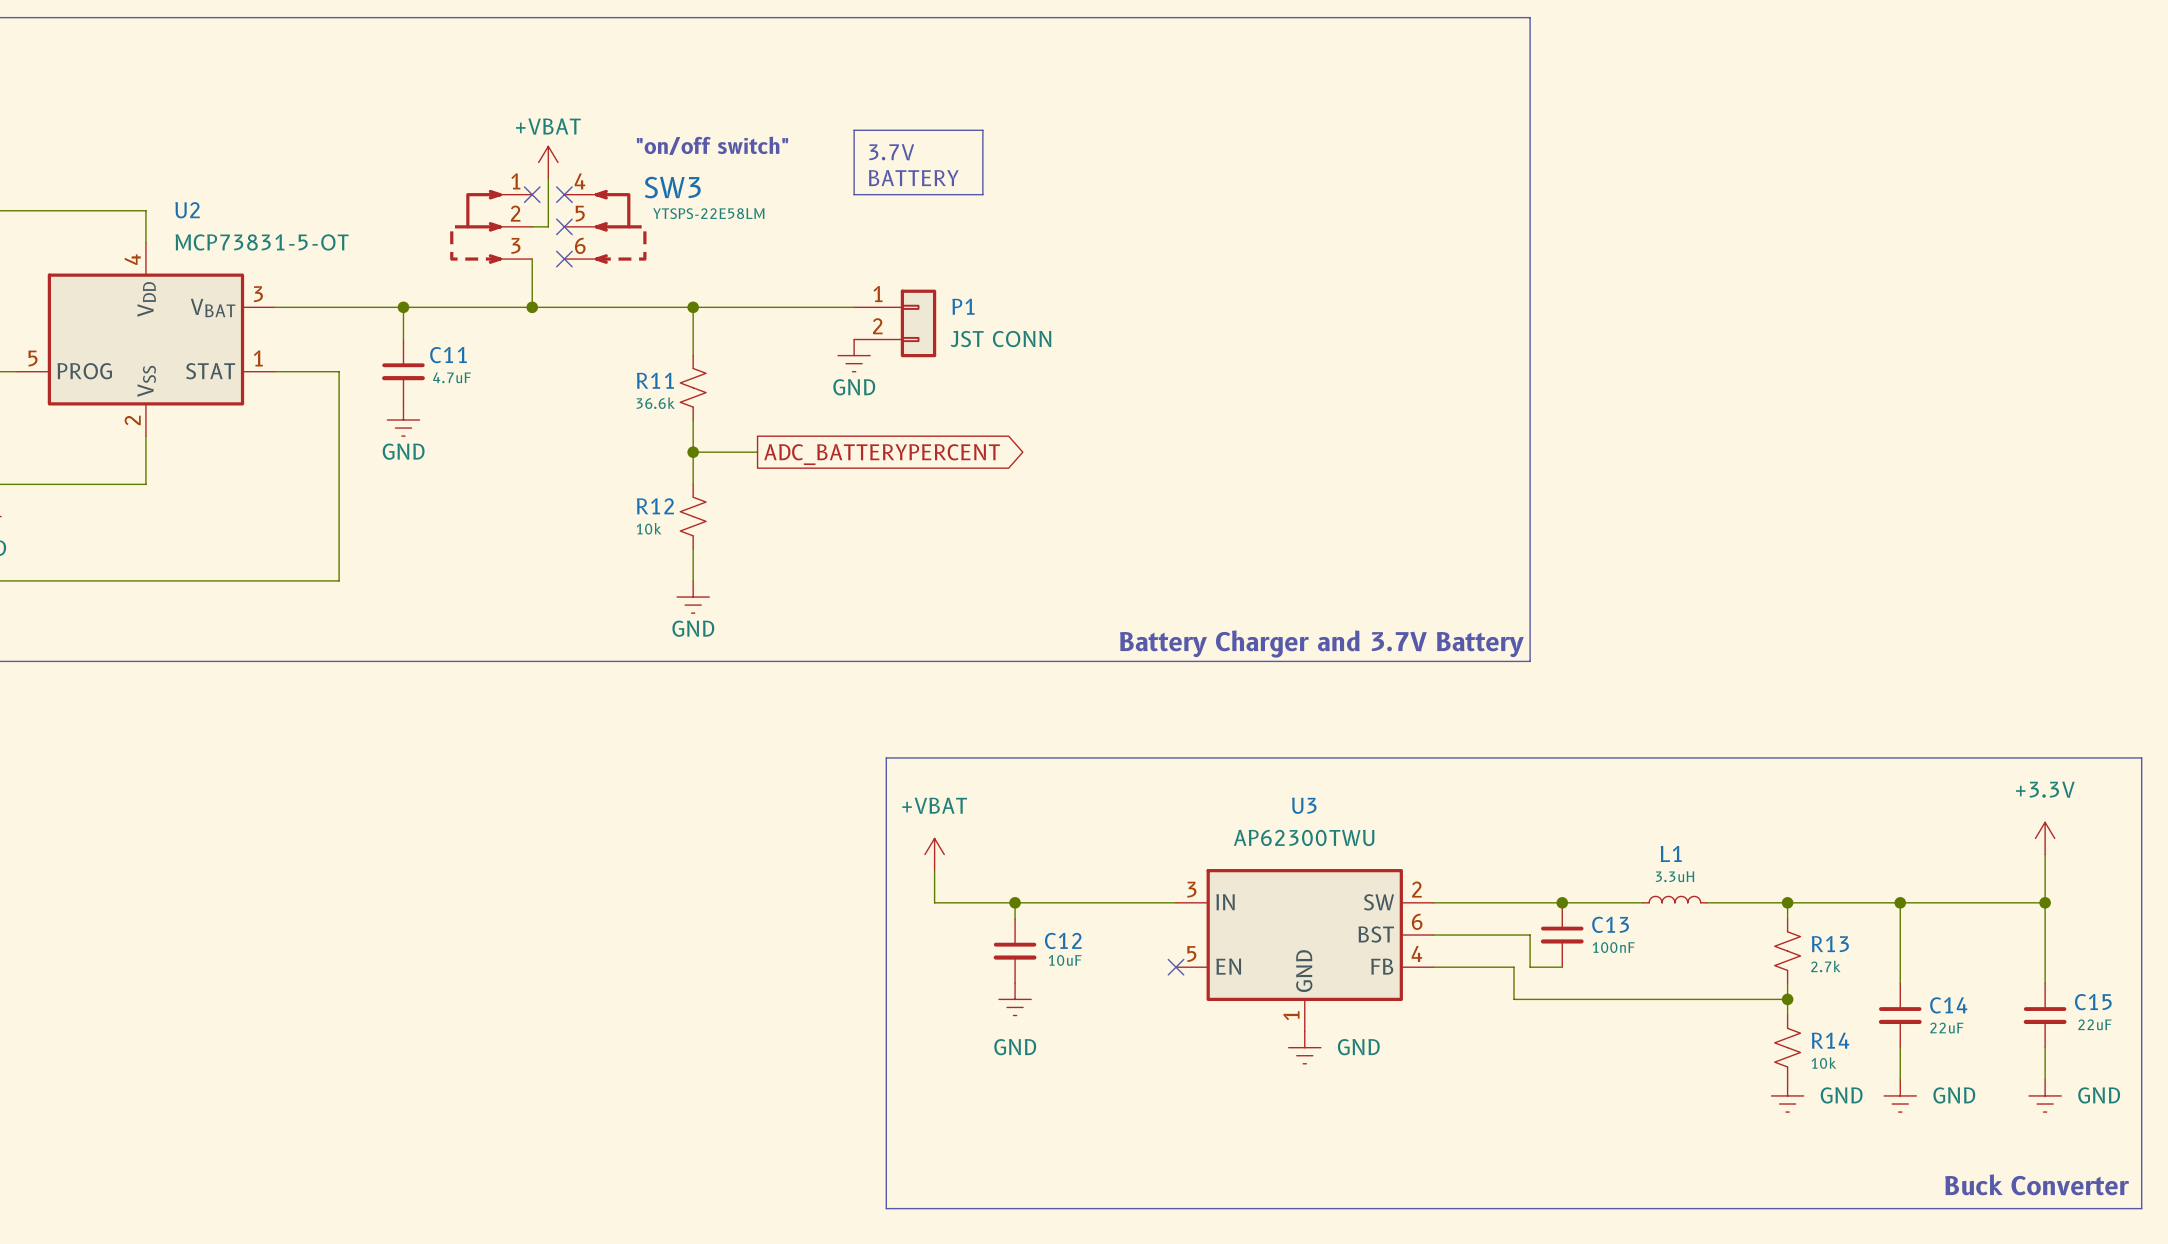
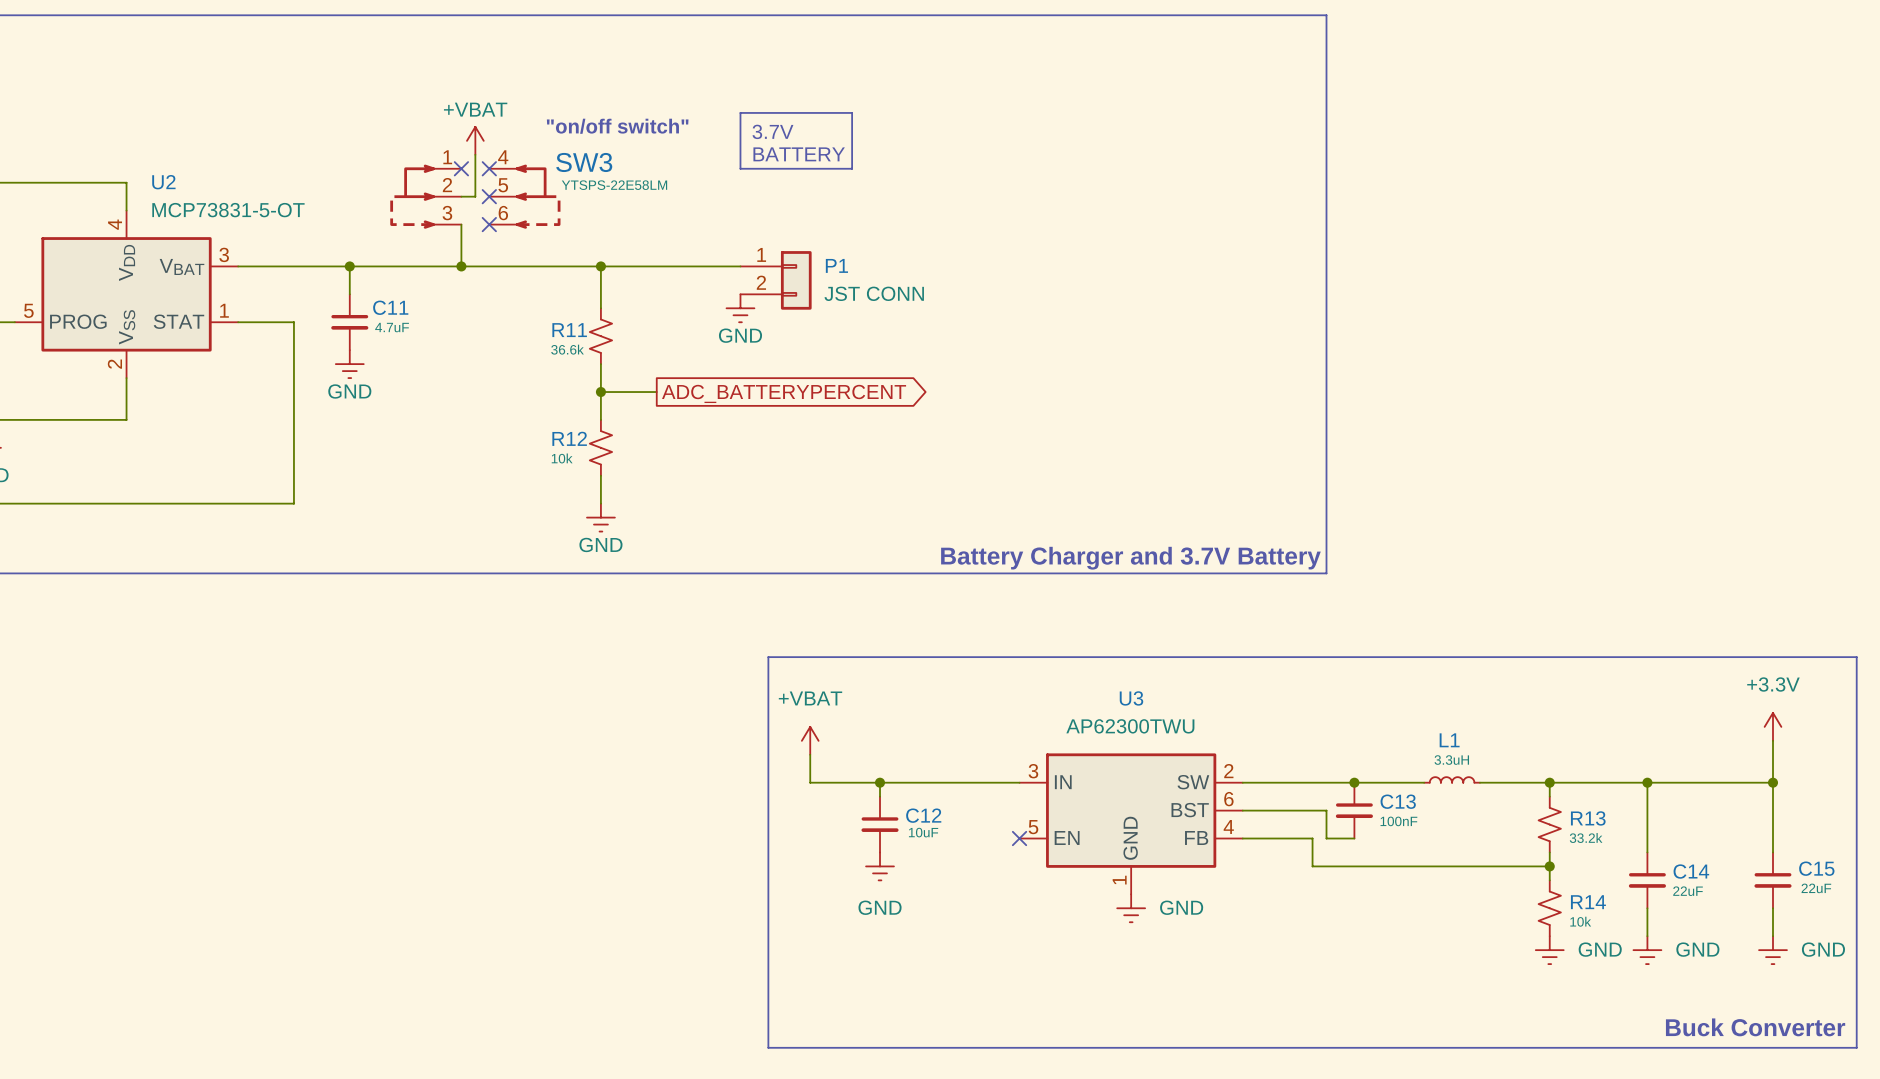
R13 value: 2.7k (1825, 966) -> 33.2k (1586, 837)

